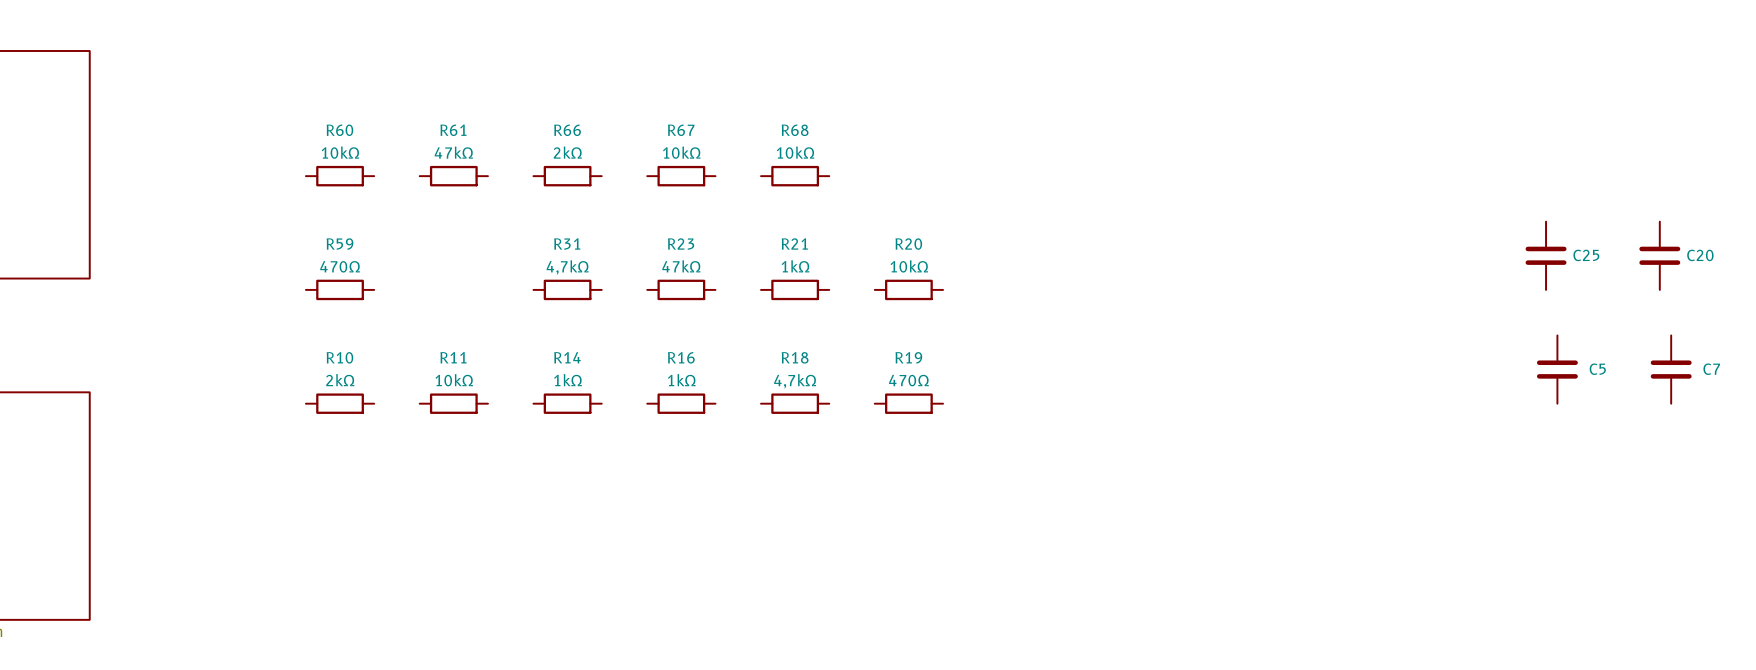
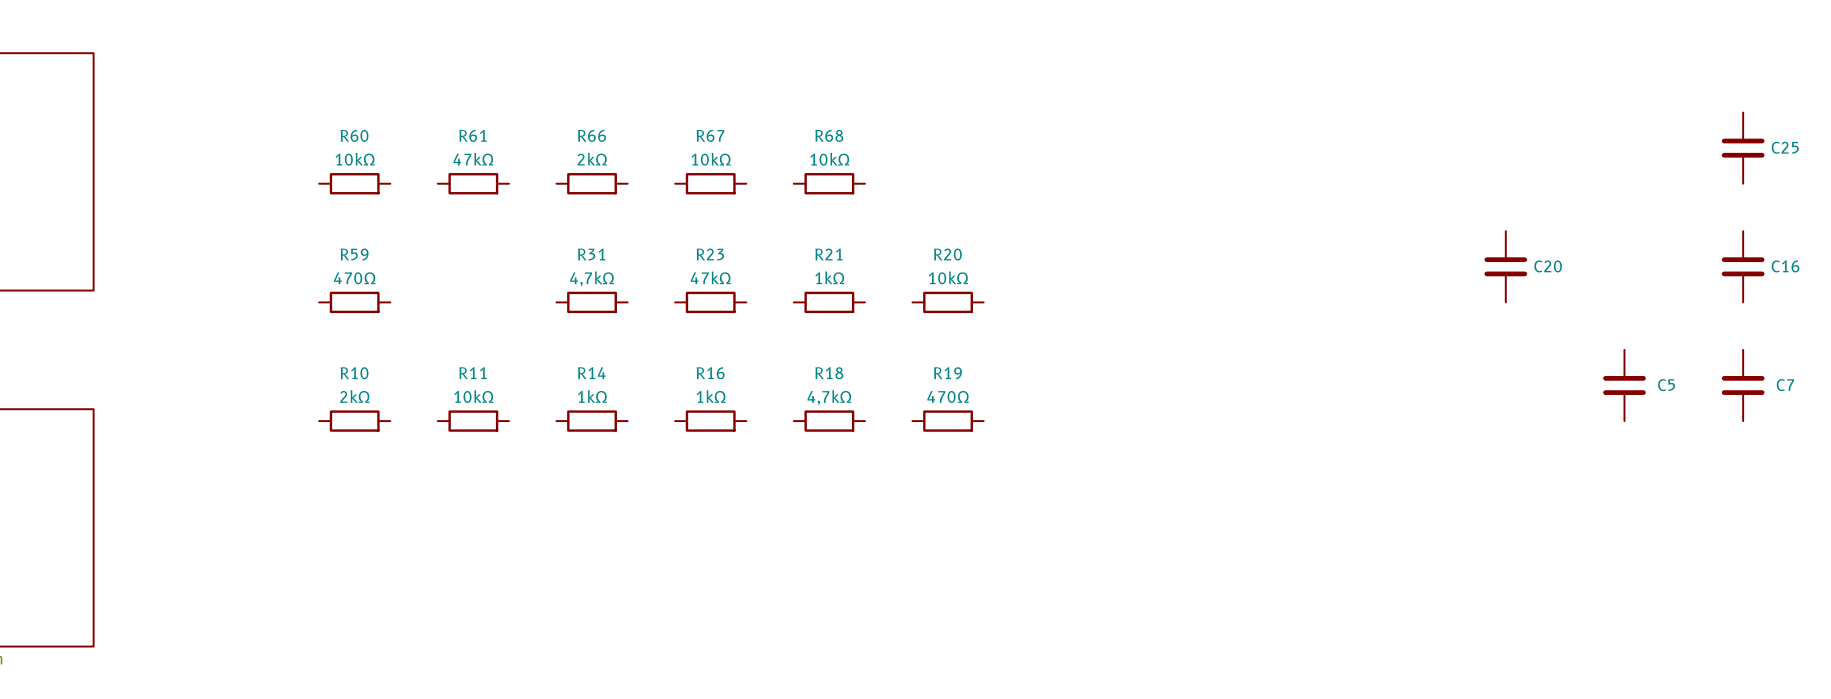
C25 position: (1546, 255) -> (1743, 148)
C20 position: (1659, 255) -> (1505, 266)
C16: none -> (1743, 266)

